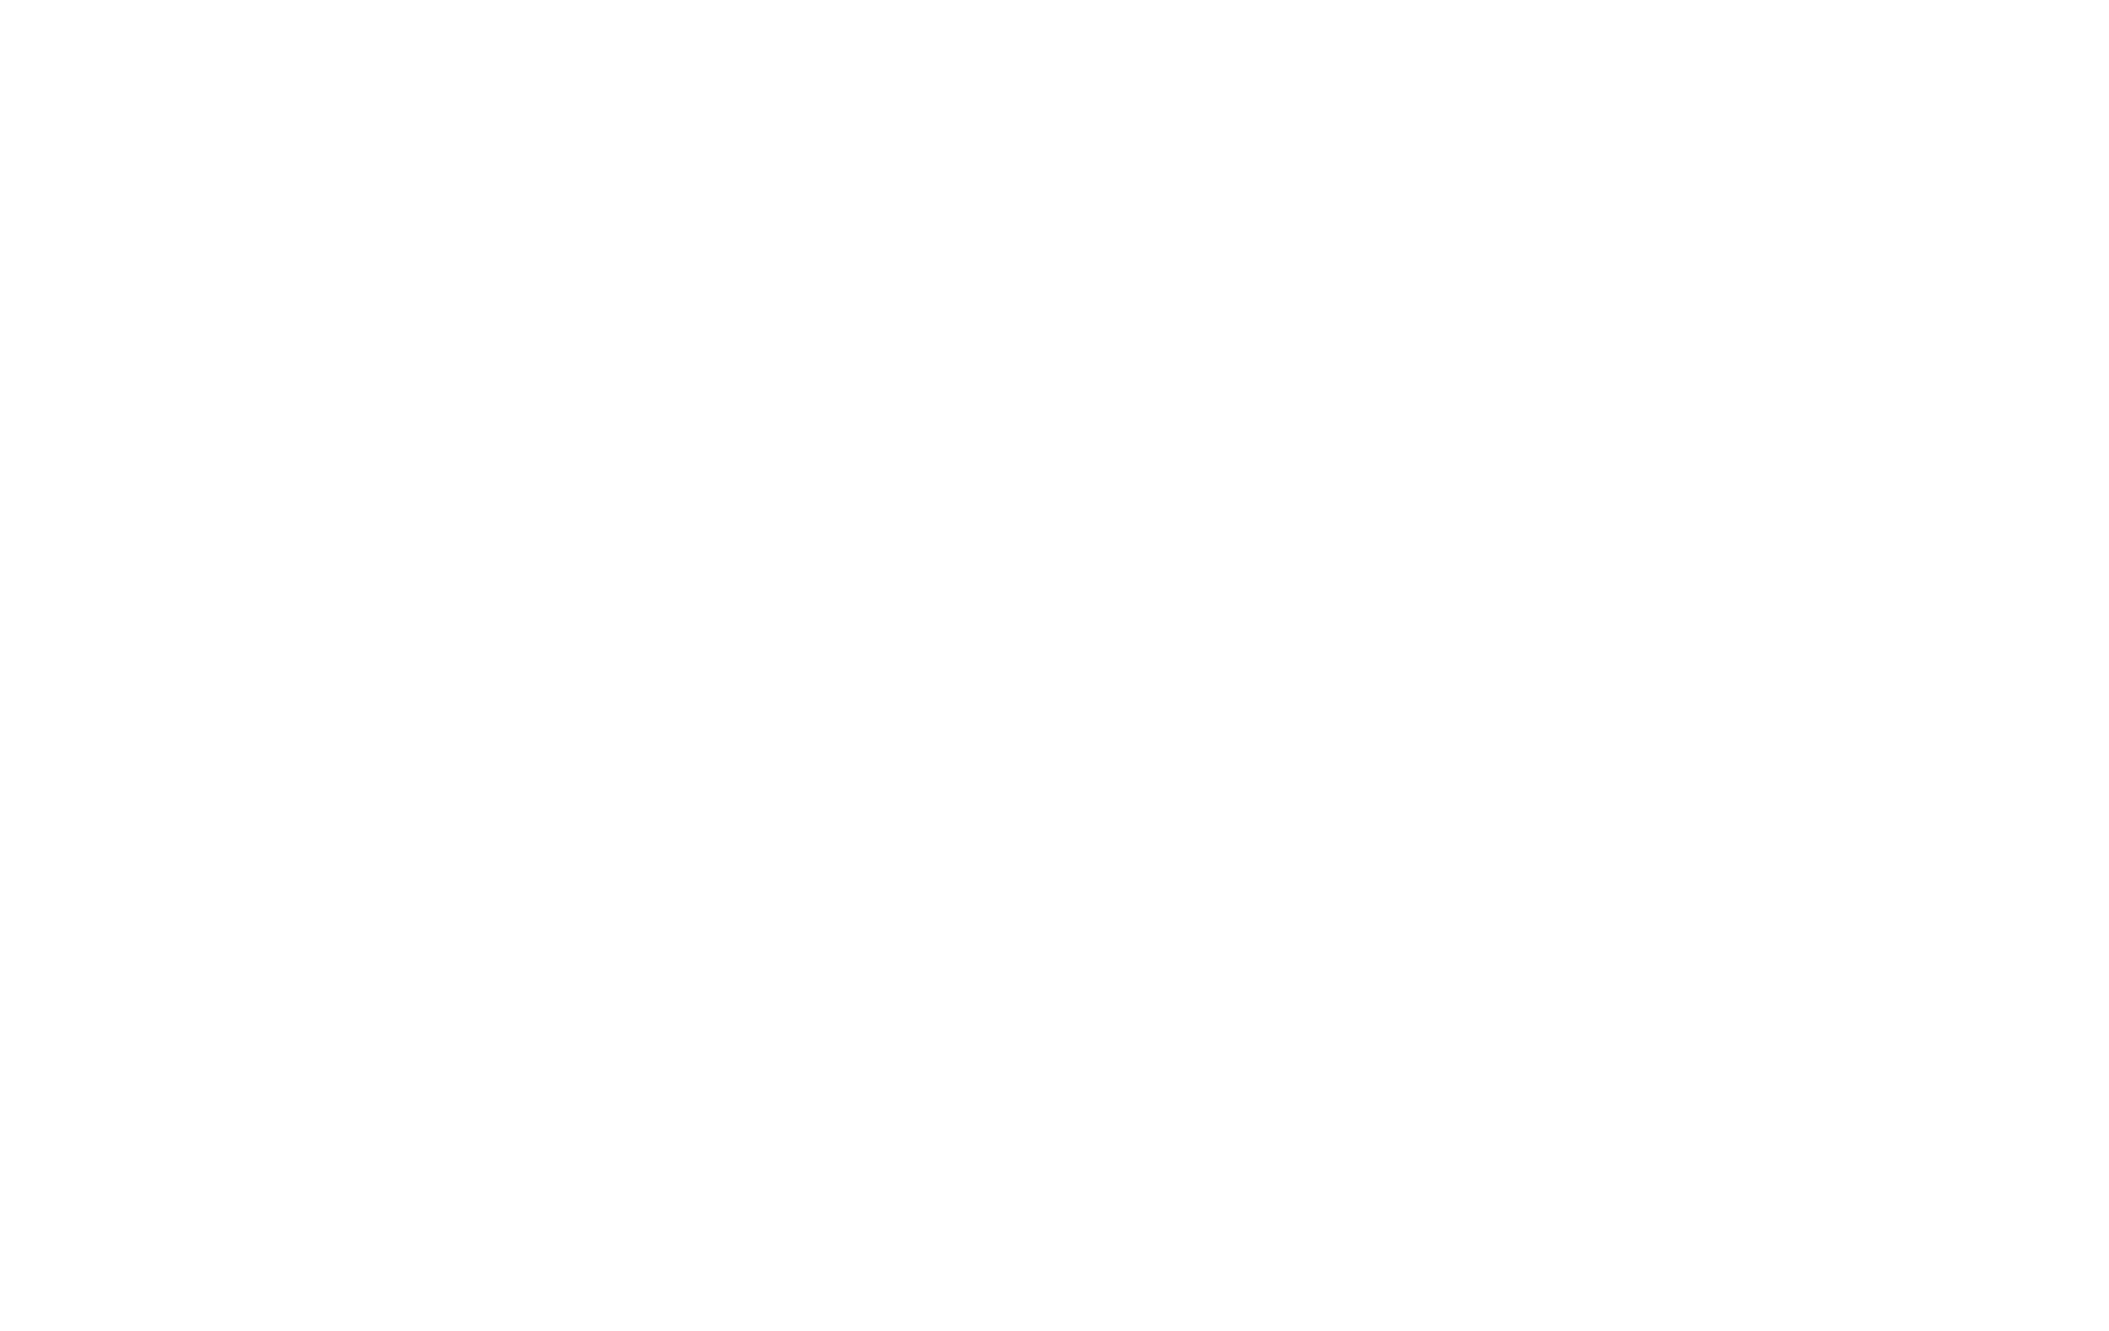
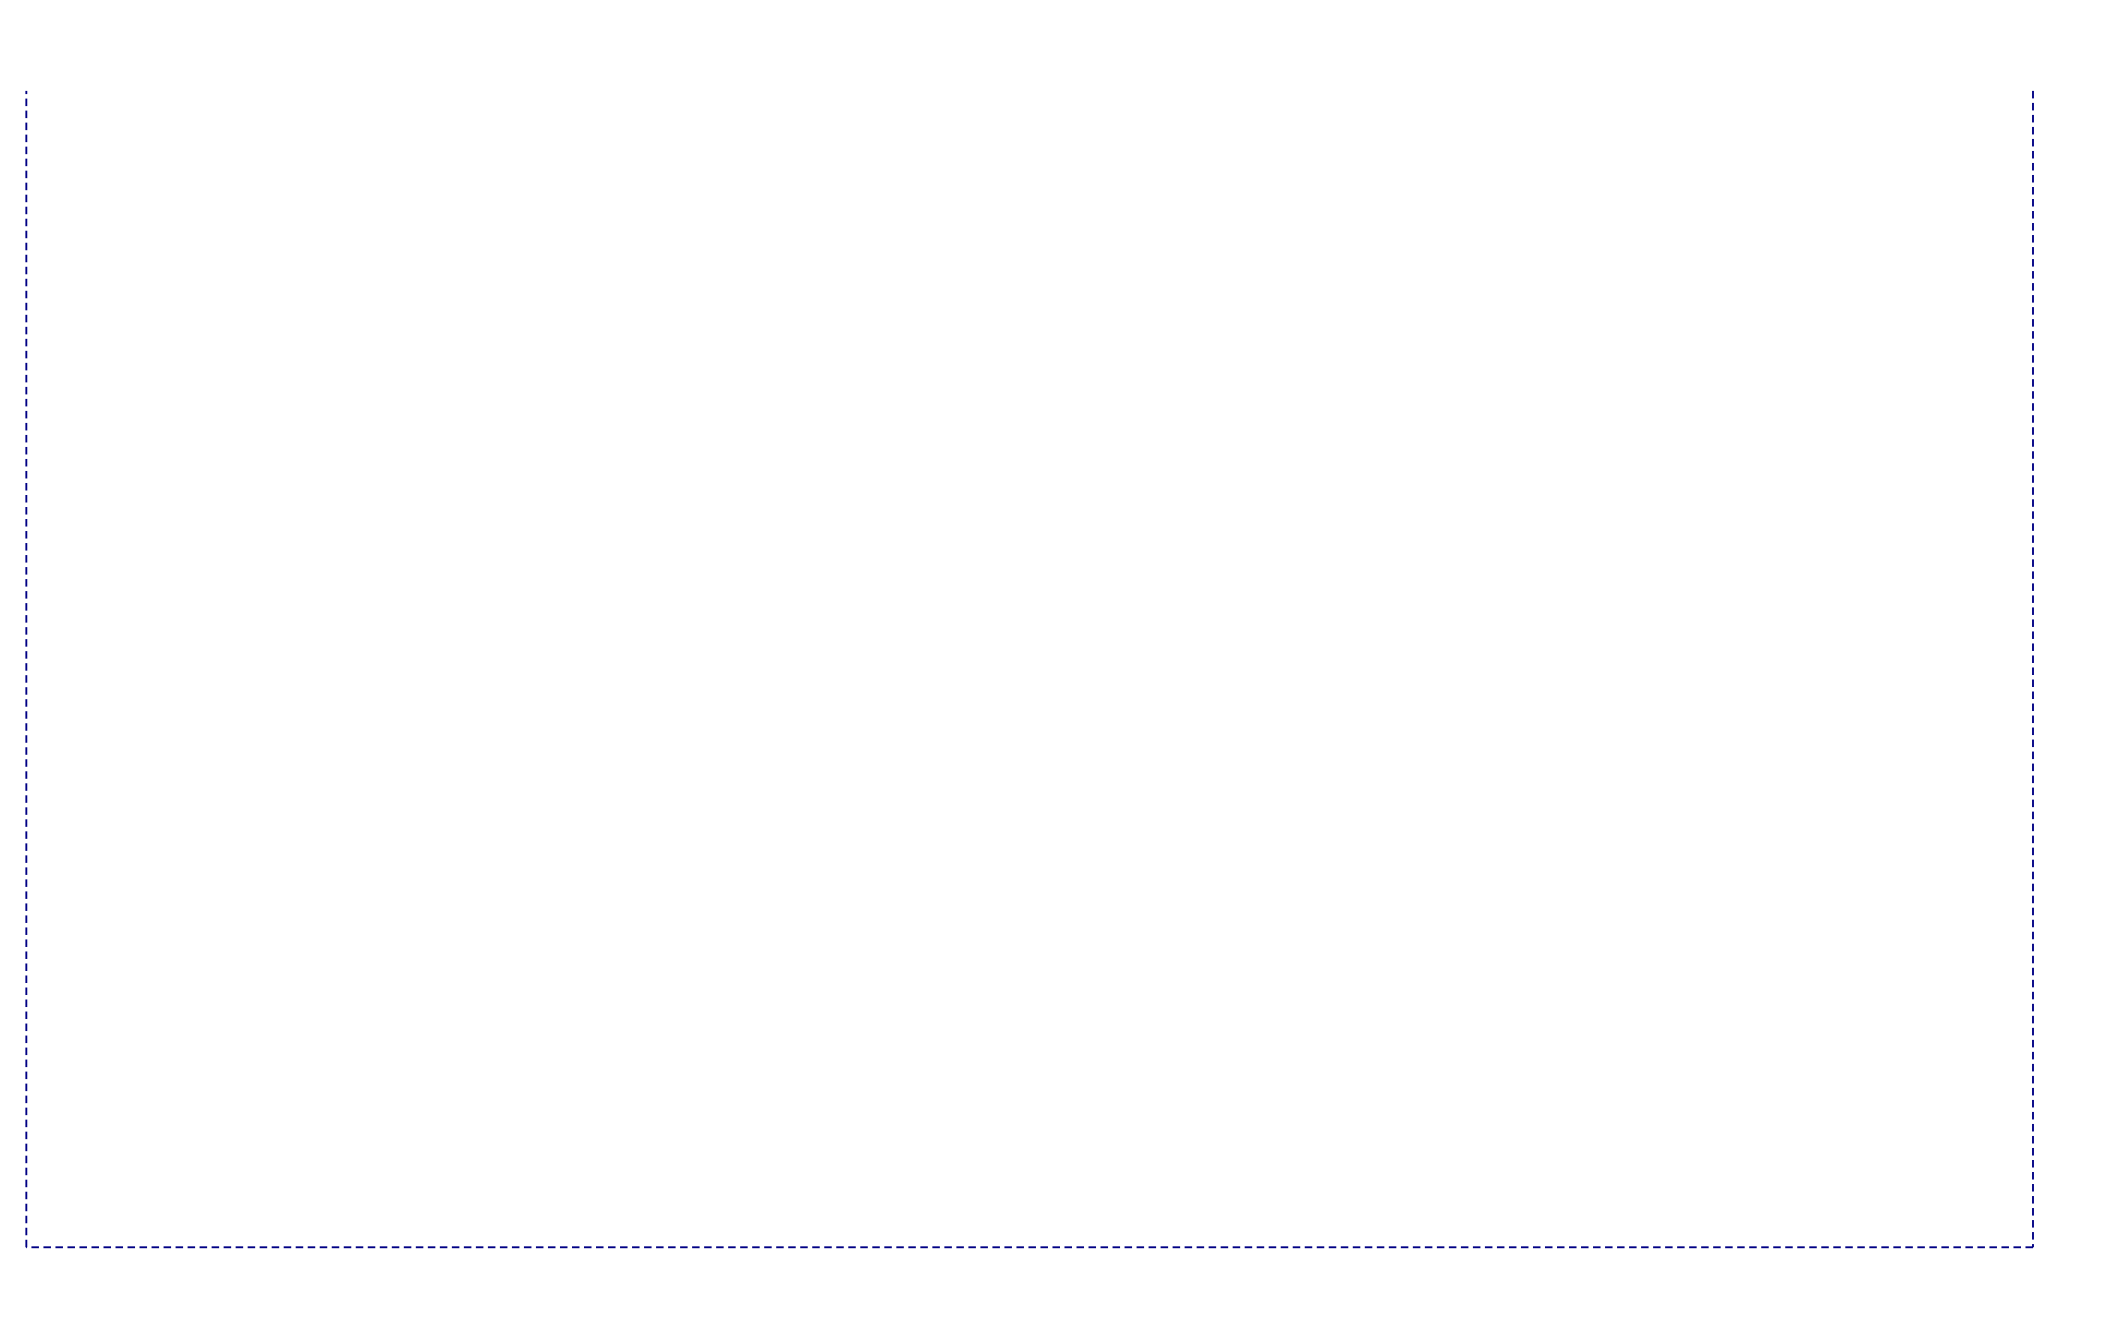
line: none -> (26, 90) (26, 1247) (2032, 1247) (2032, 90)

